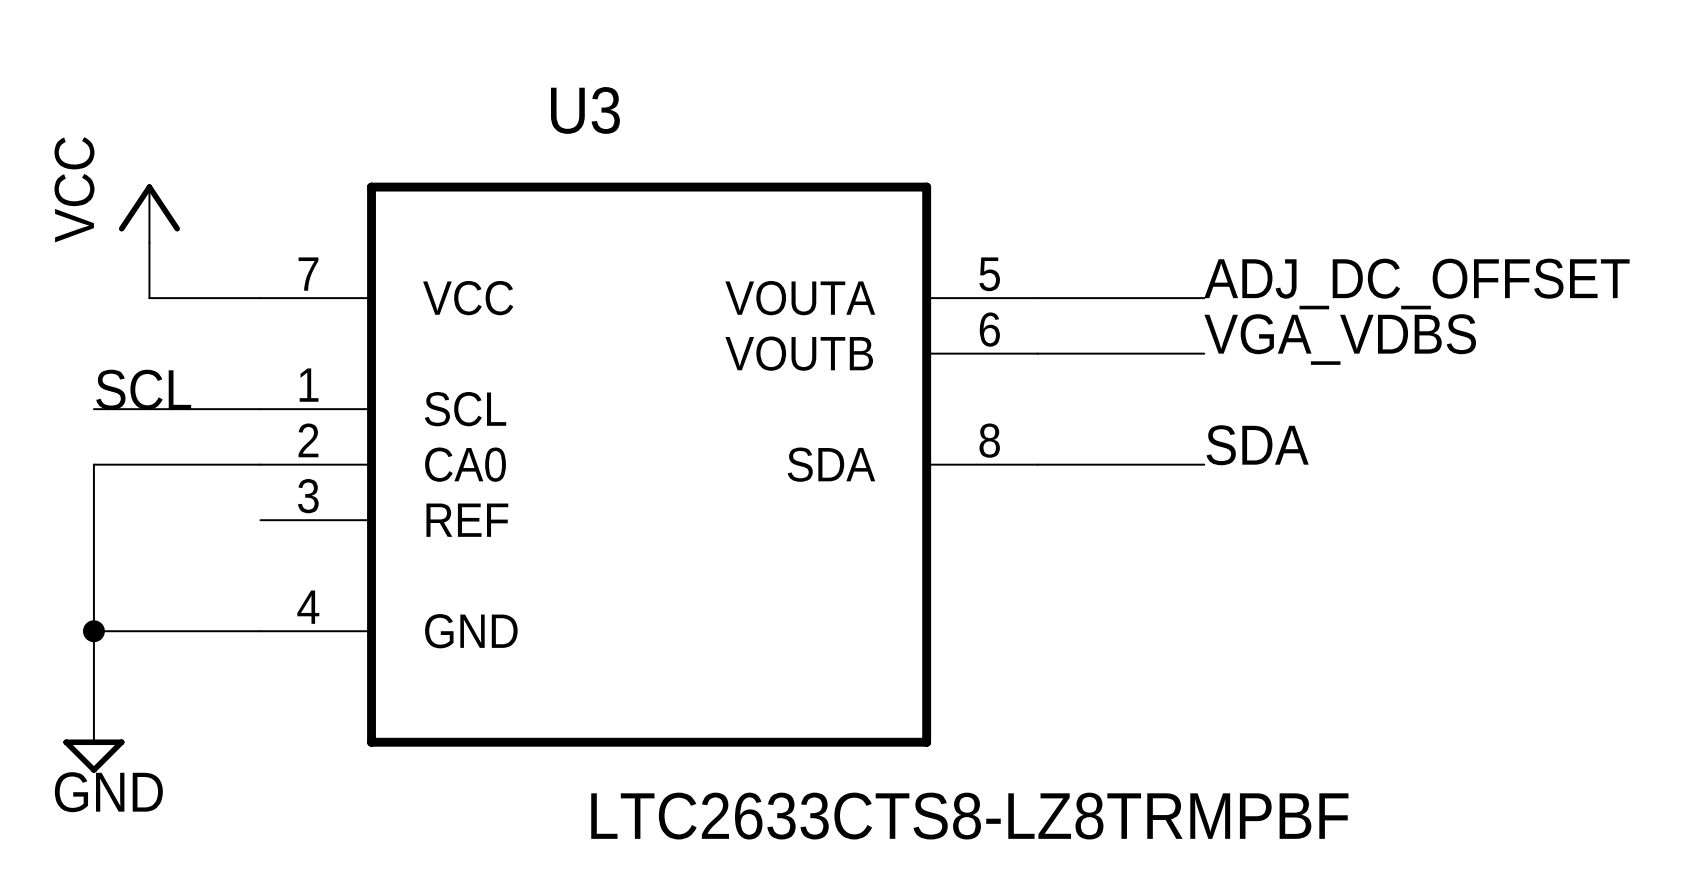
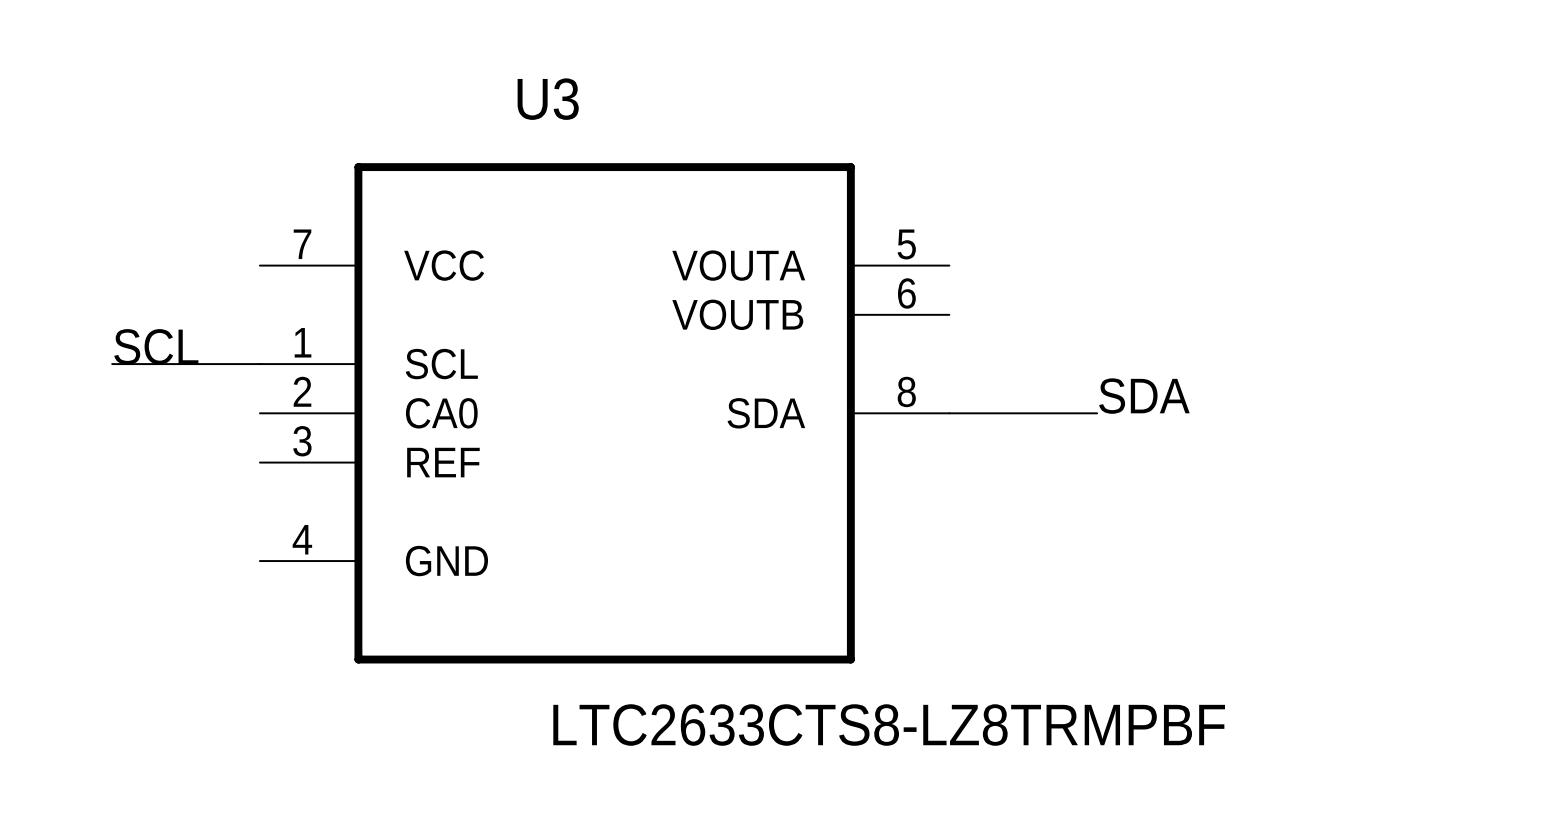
power symbol: VCC (149, 213) -> none
wire: (149, 242) (149, 298) (260, 298) -> none
label: ADJ_DC_OFFSET (1416, 284) -> none
wire: (1037, 298) (1204, 298) -> none
label: VGA_VDBS (1340, 339) -> none
wire: (1037, 353) (1204, 353) -> none
wire: (260, 464) (93, 464) (93, 686) -> none
wire: (93, 631) (260, 631) -> none
junction: (93, 631) -> none
power symbol: GND (93, 729) -> none

